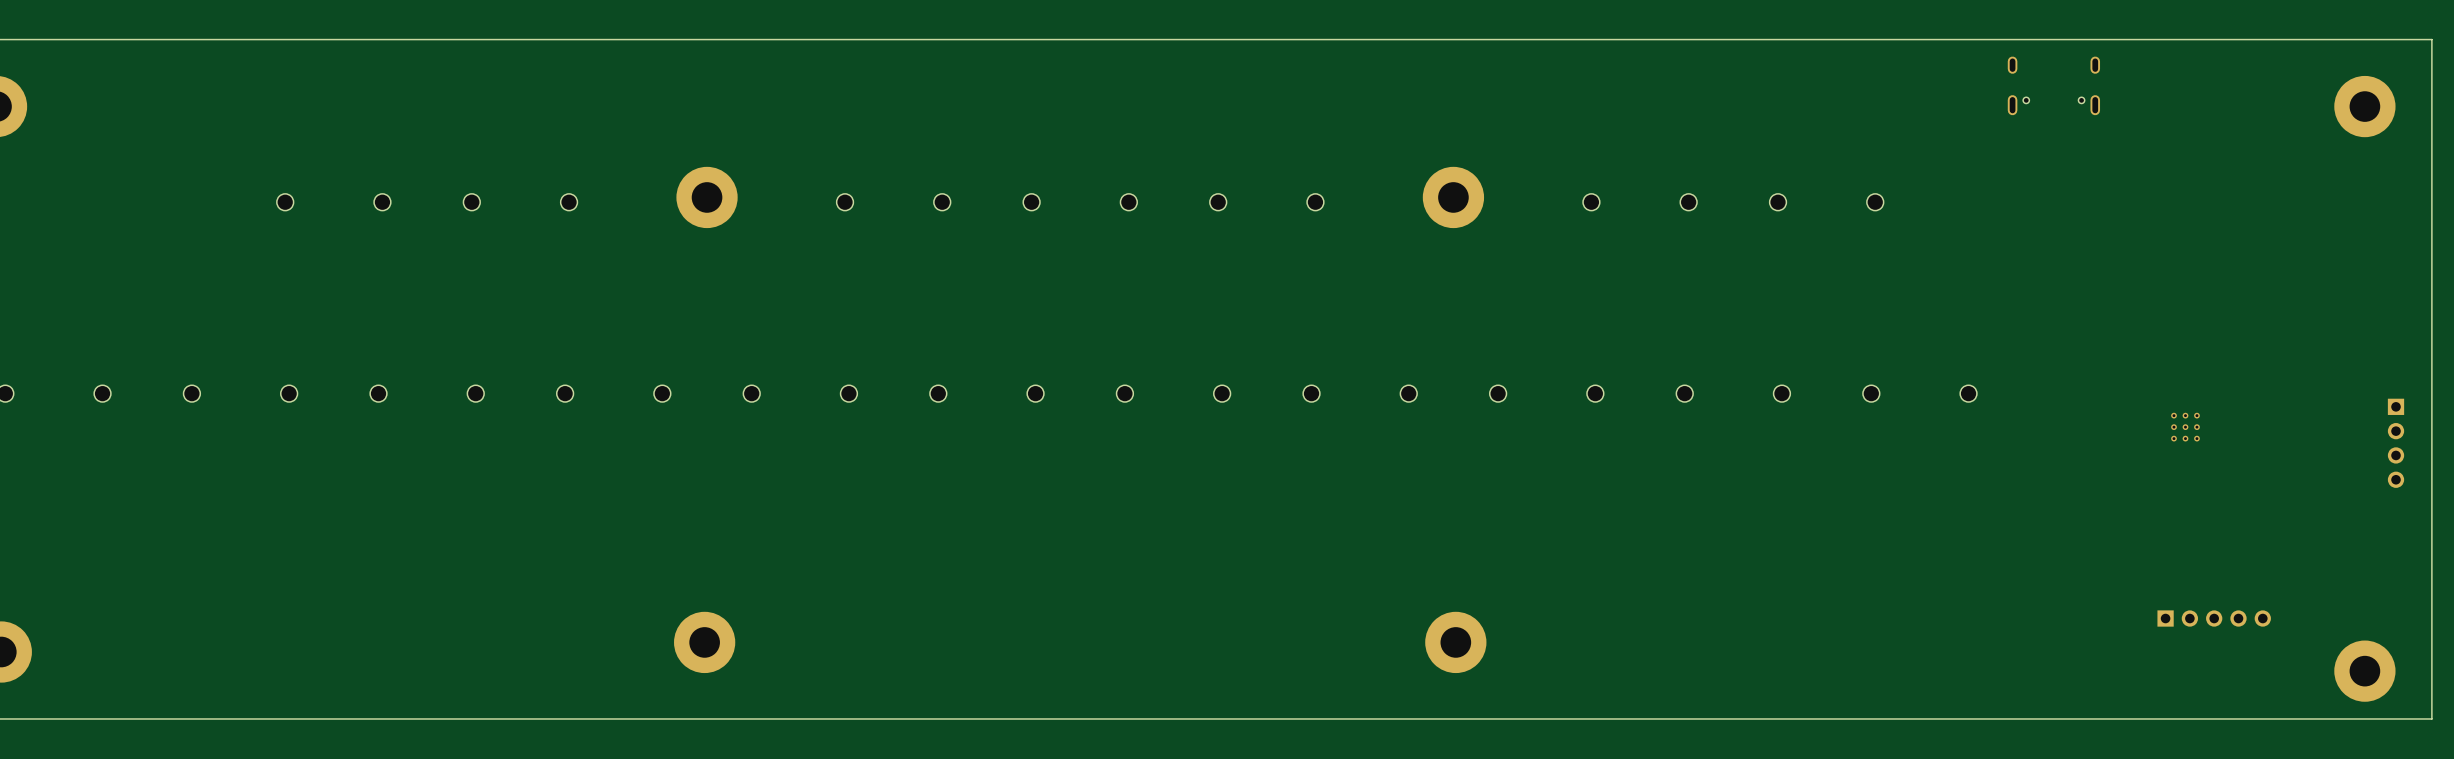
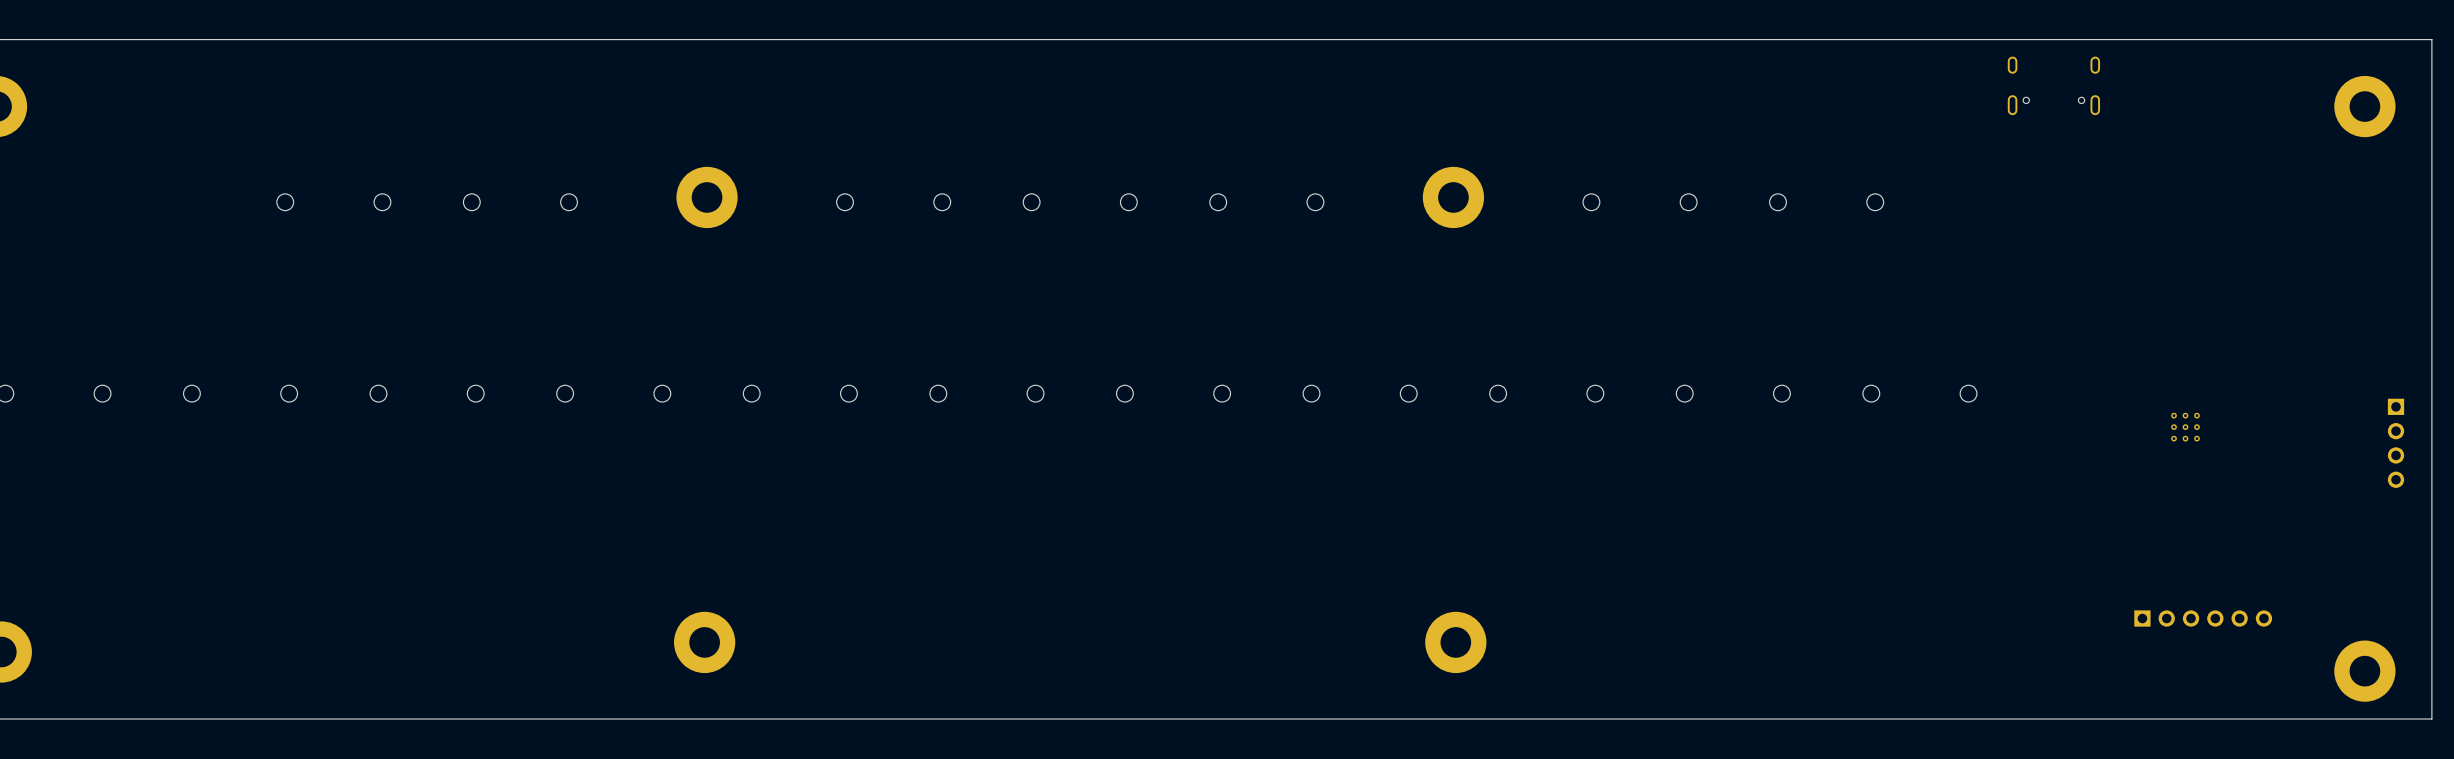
part: none -> (2203, 618)
part: (2214, 618) -> none

